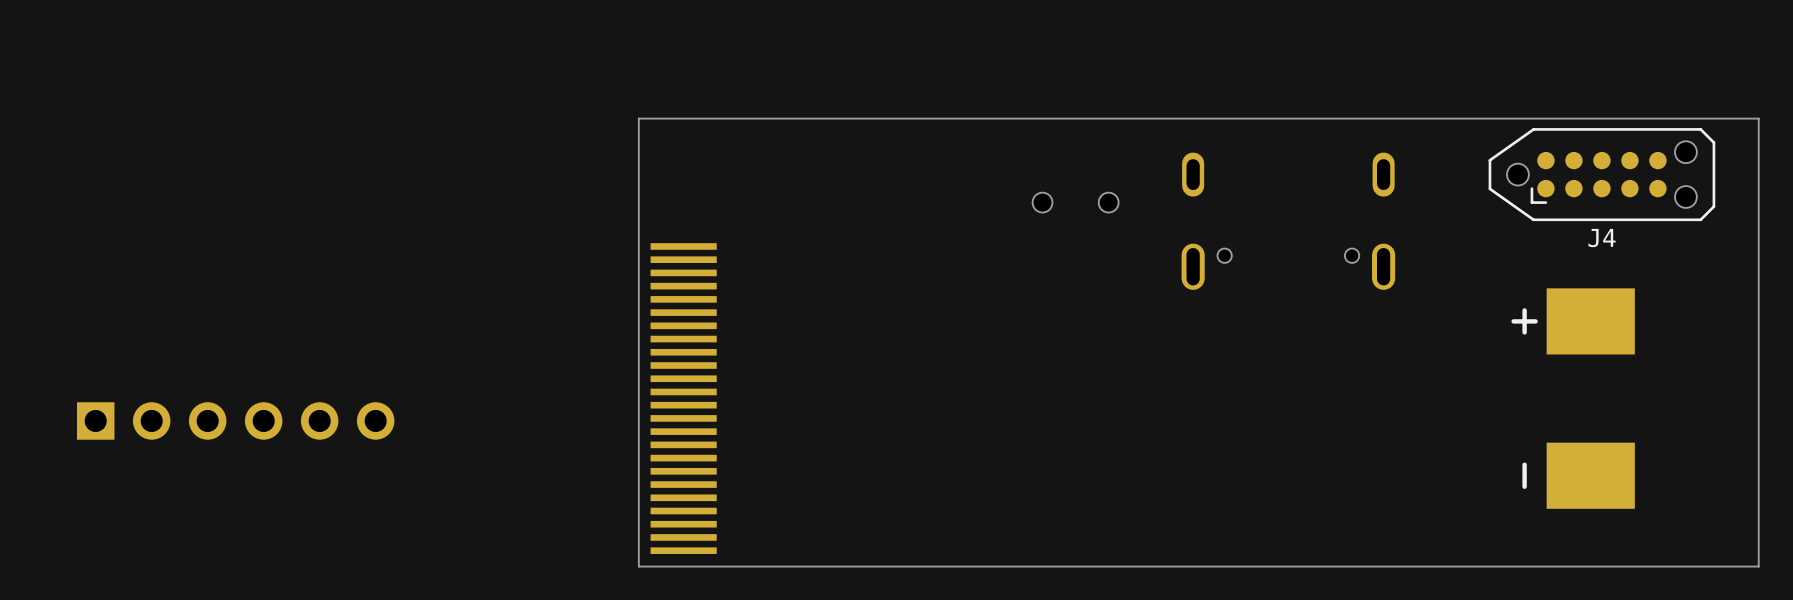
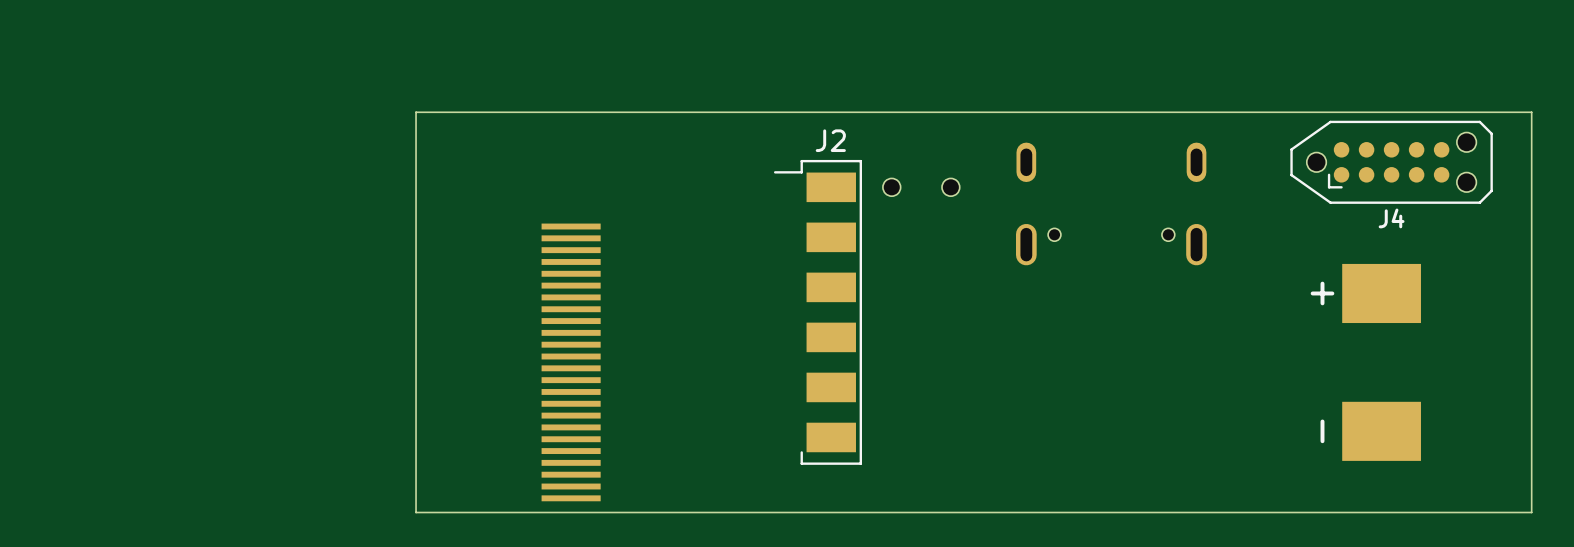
board edge: (638, 118) (638, 566) -> (531, 112) (416, 112) (416, 512) (531, 512)
J2: none -> (817, 312)
part: (235, 420) -> none

